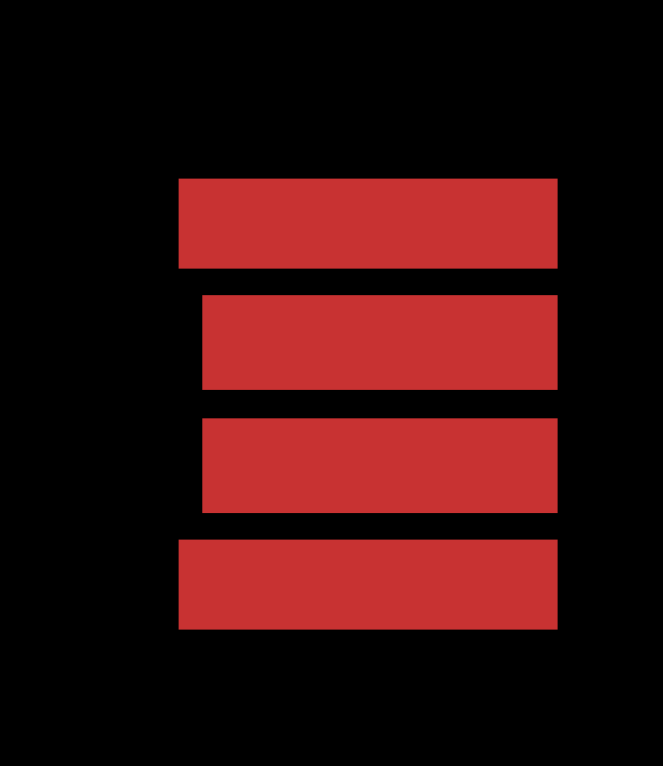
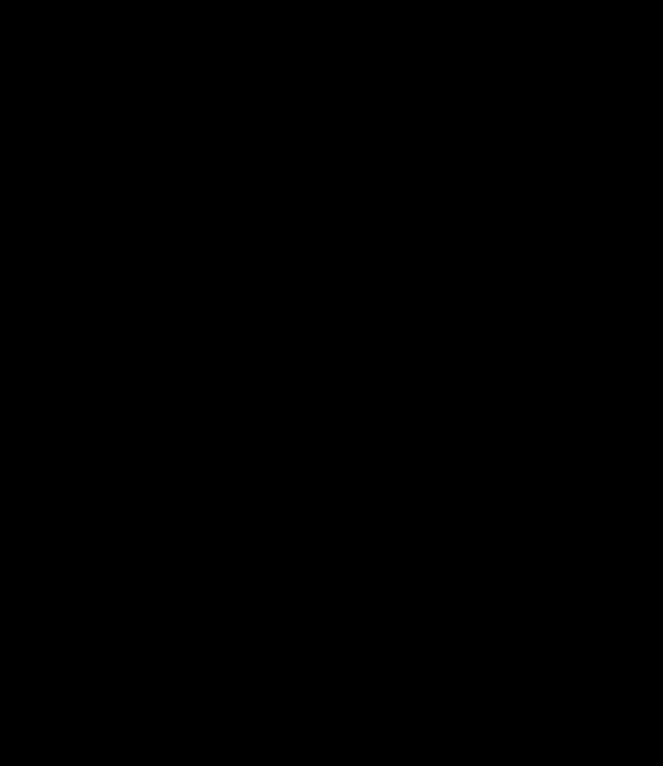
part: (368, 404) -> none

